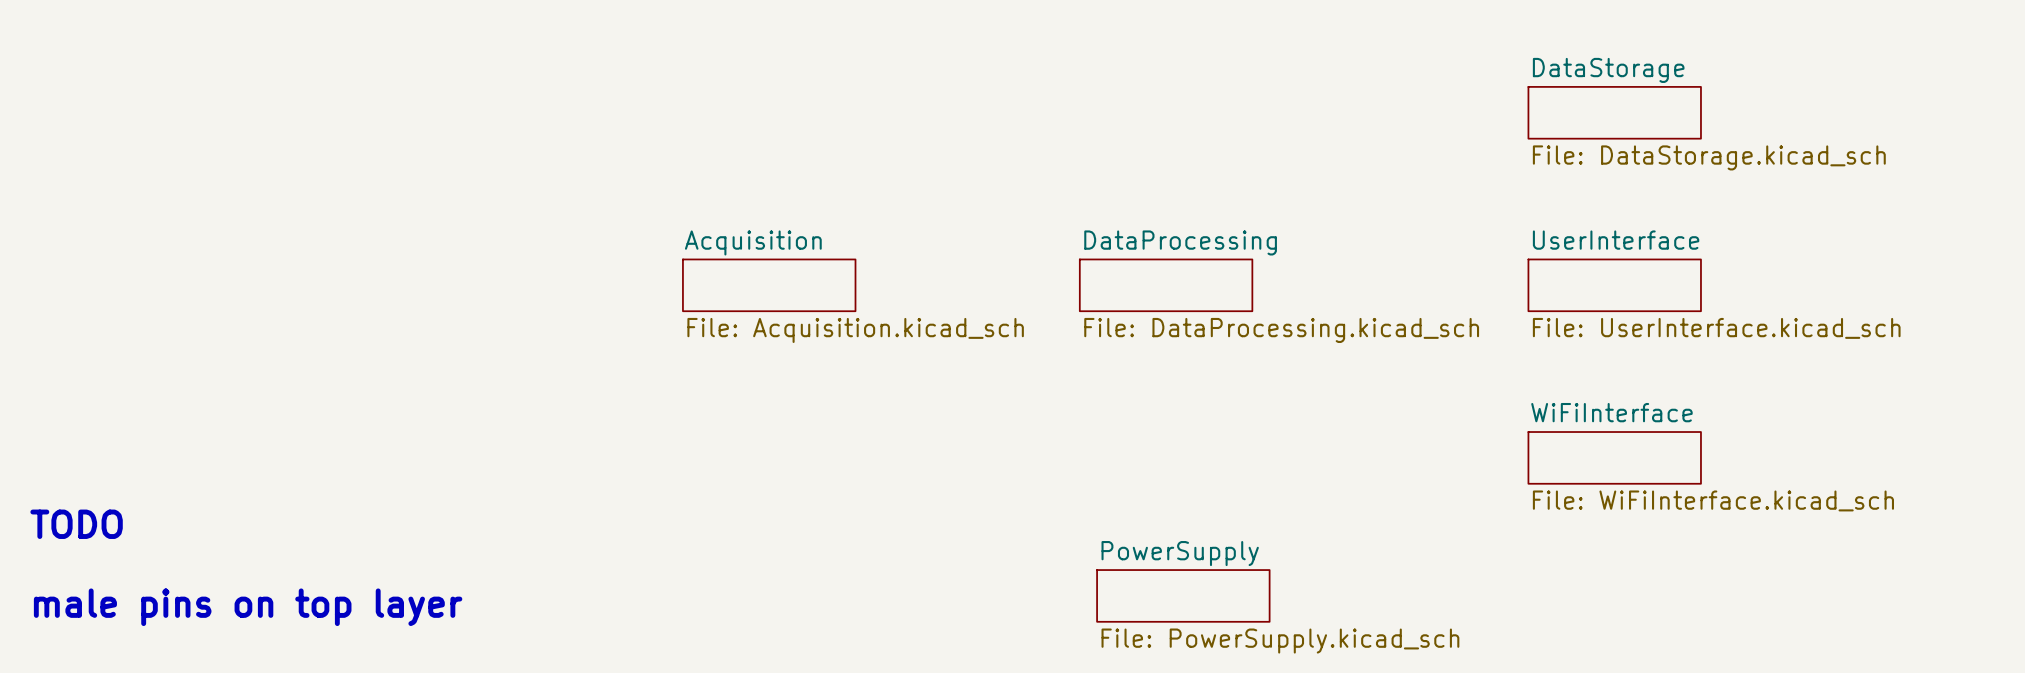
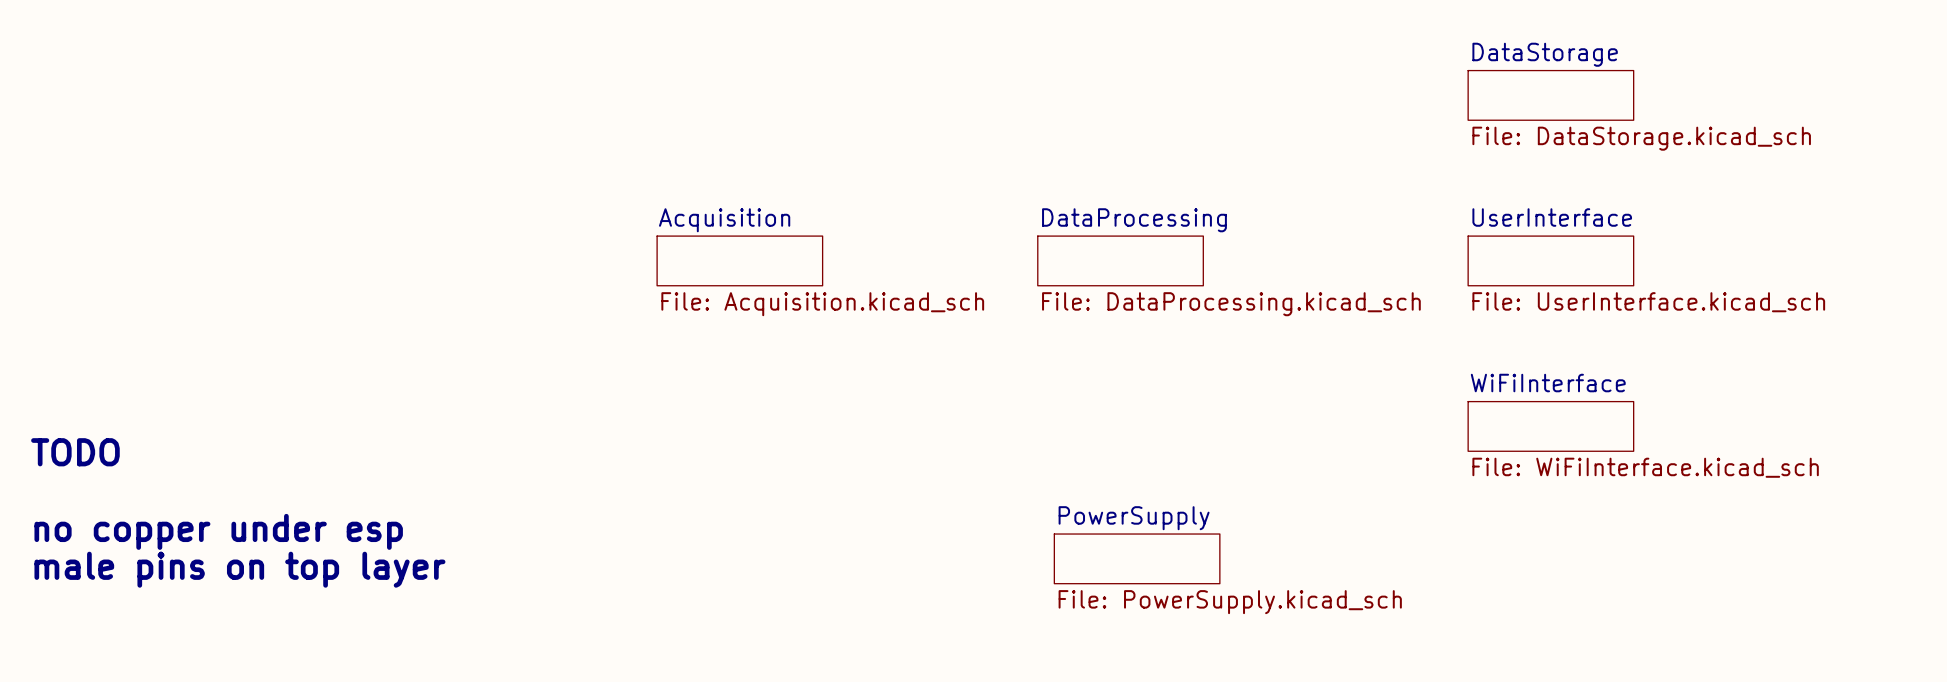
text position: TODO (76, 524) -> TODO (75, 452)
text: none -> no copper under esp (218, 531)

